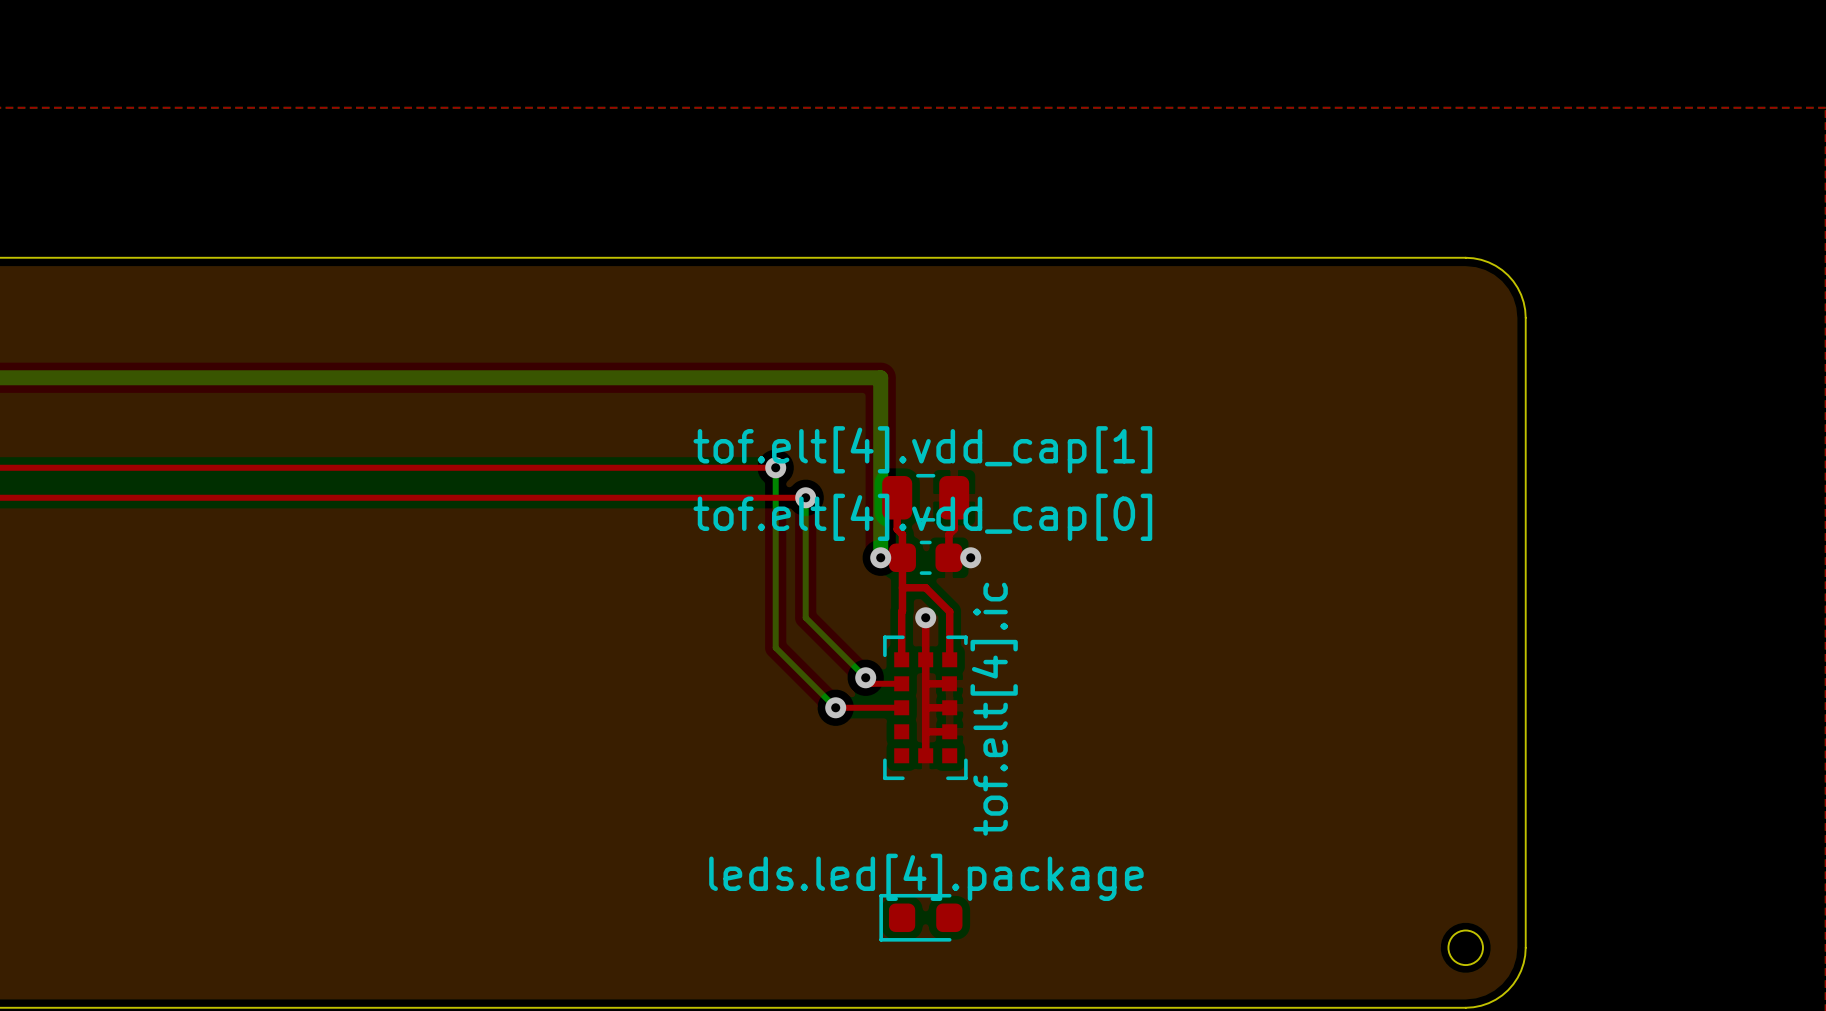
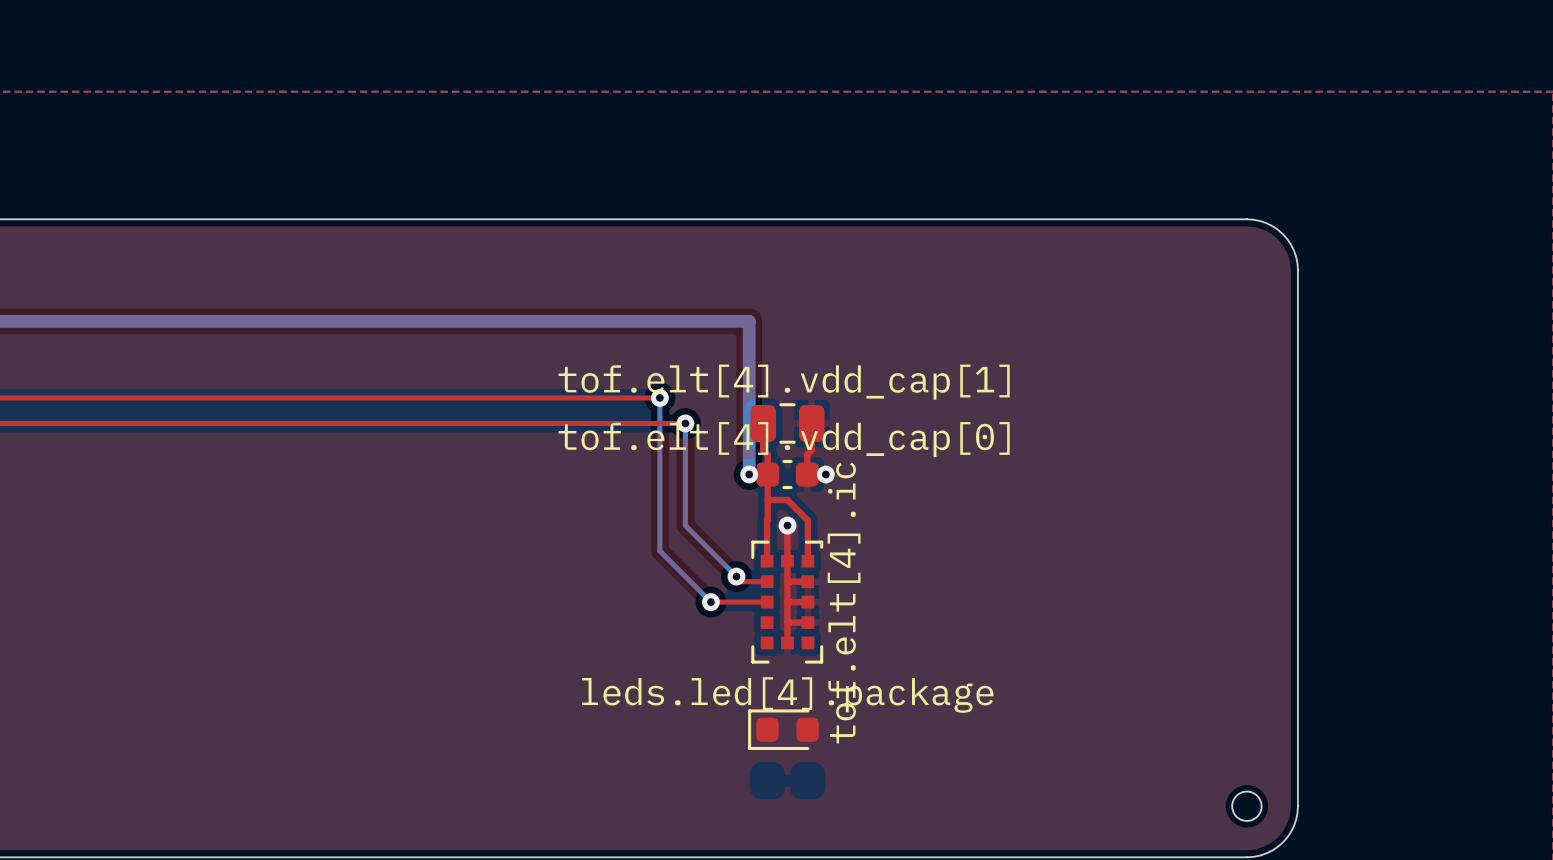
leds.led[4].package position: (920, 917) -> (783, 729)

